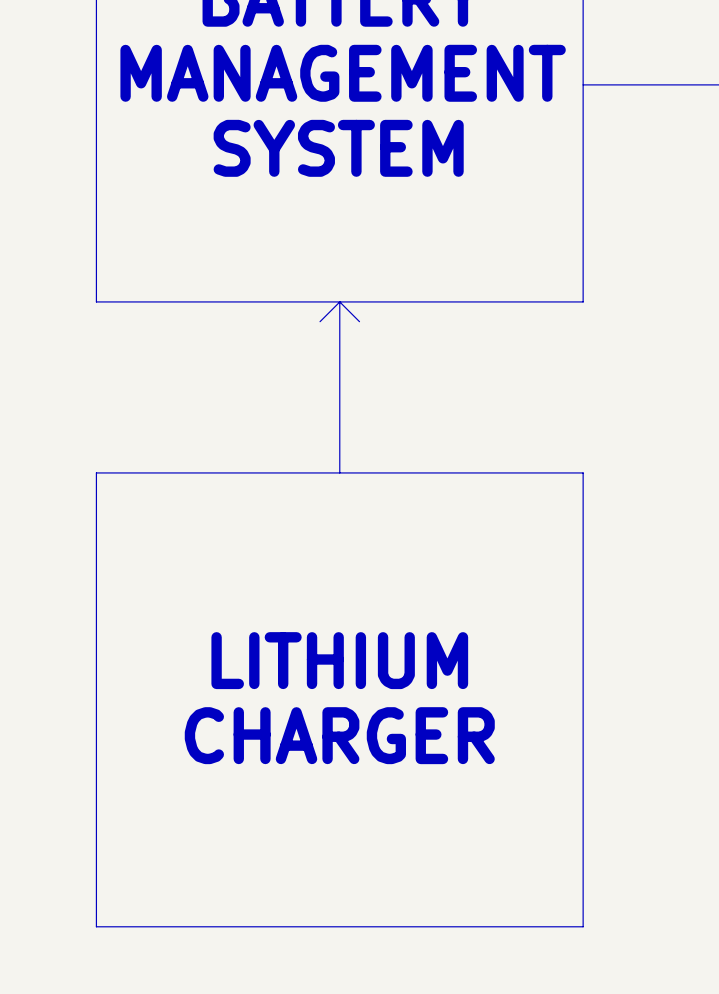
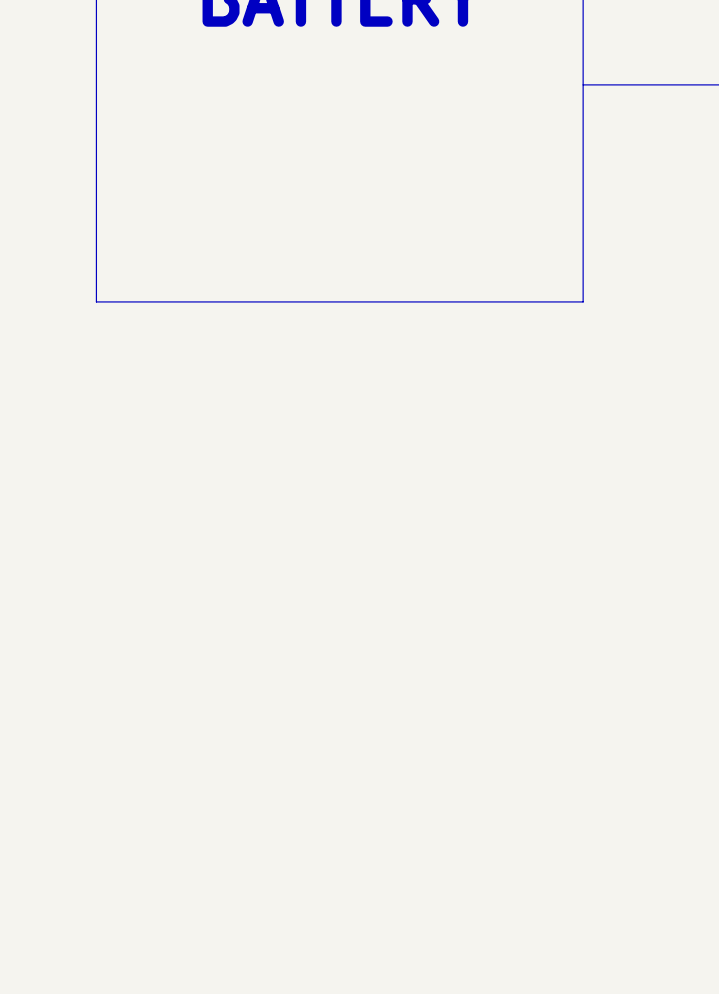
text: MANAGEMENT (343, 73) -> none
text: SYSTEM (338, 148) -> none
line: (339, 301) (339, 472) -> none
line: (339, 301) (320, 321) -> none
line: (339, 301) (359, 321) -> none
line: (96, 472) (96, 926) (583, 926) (583, 472) (96, 472) -> none
text: LITHIUM (339, 660) -> none
text: CHARGER (339, 735) -> none

